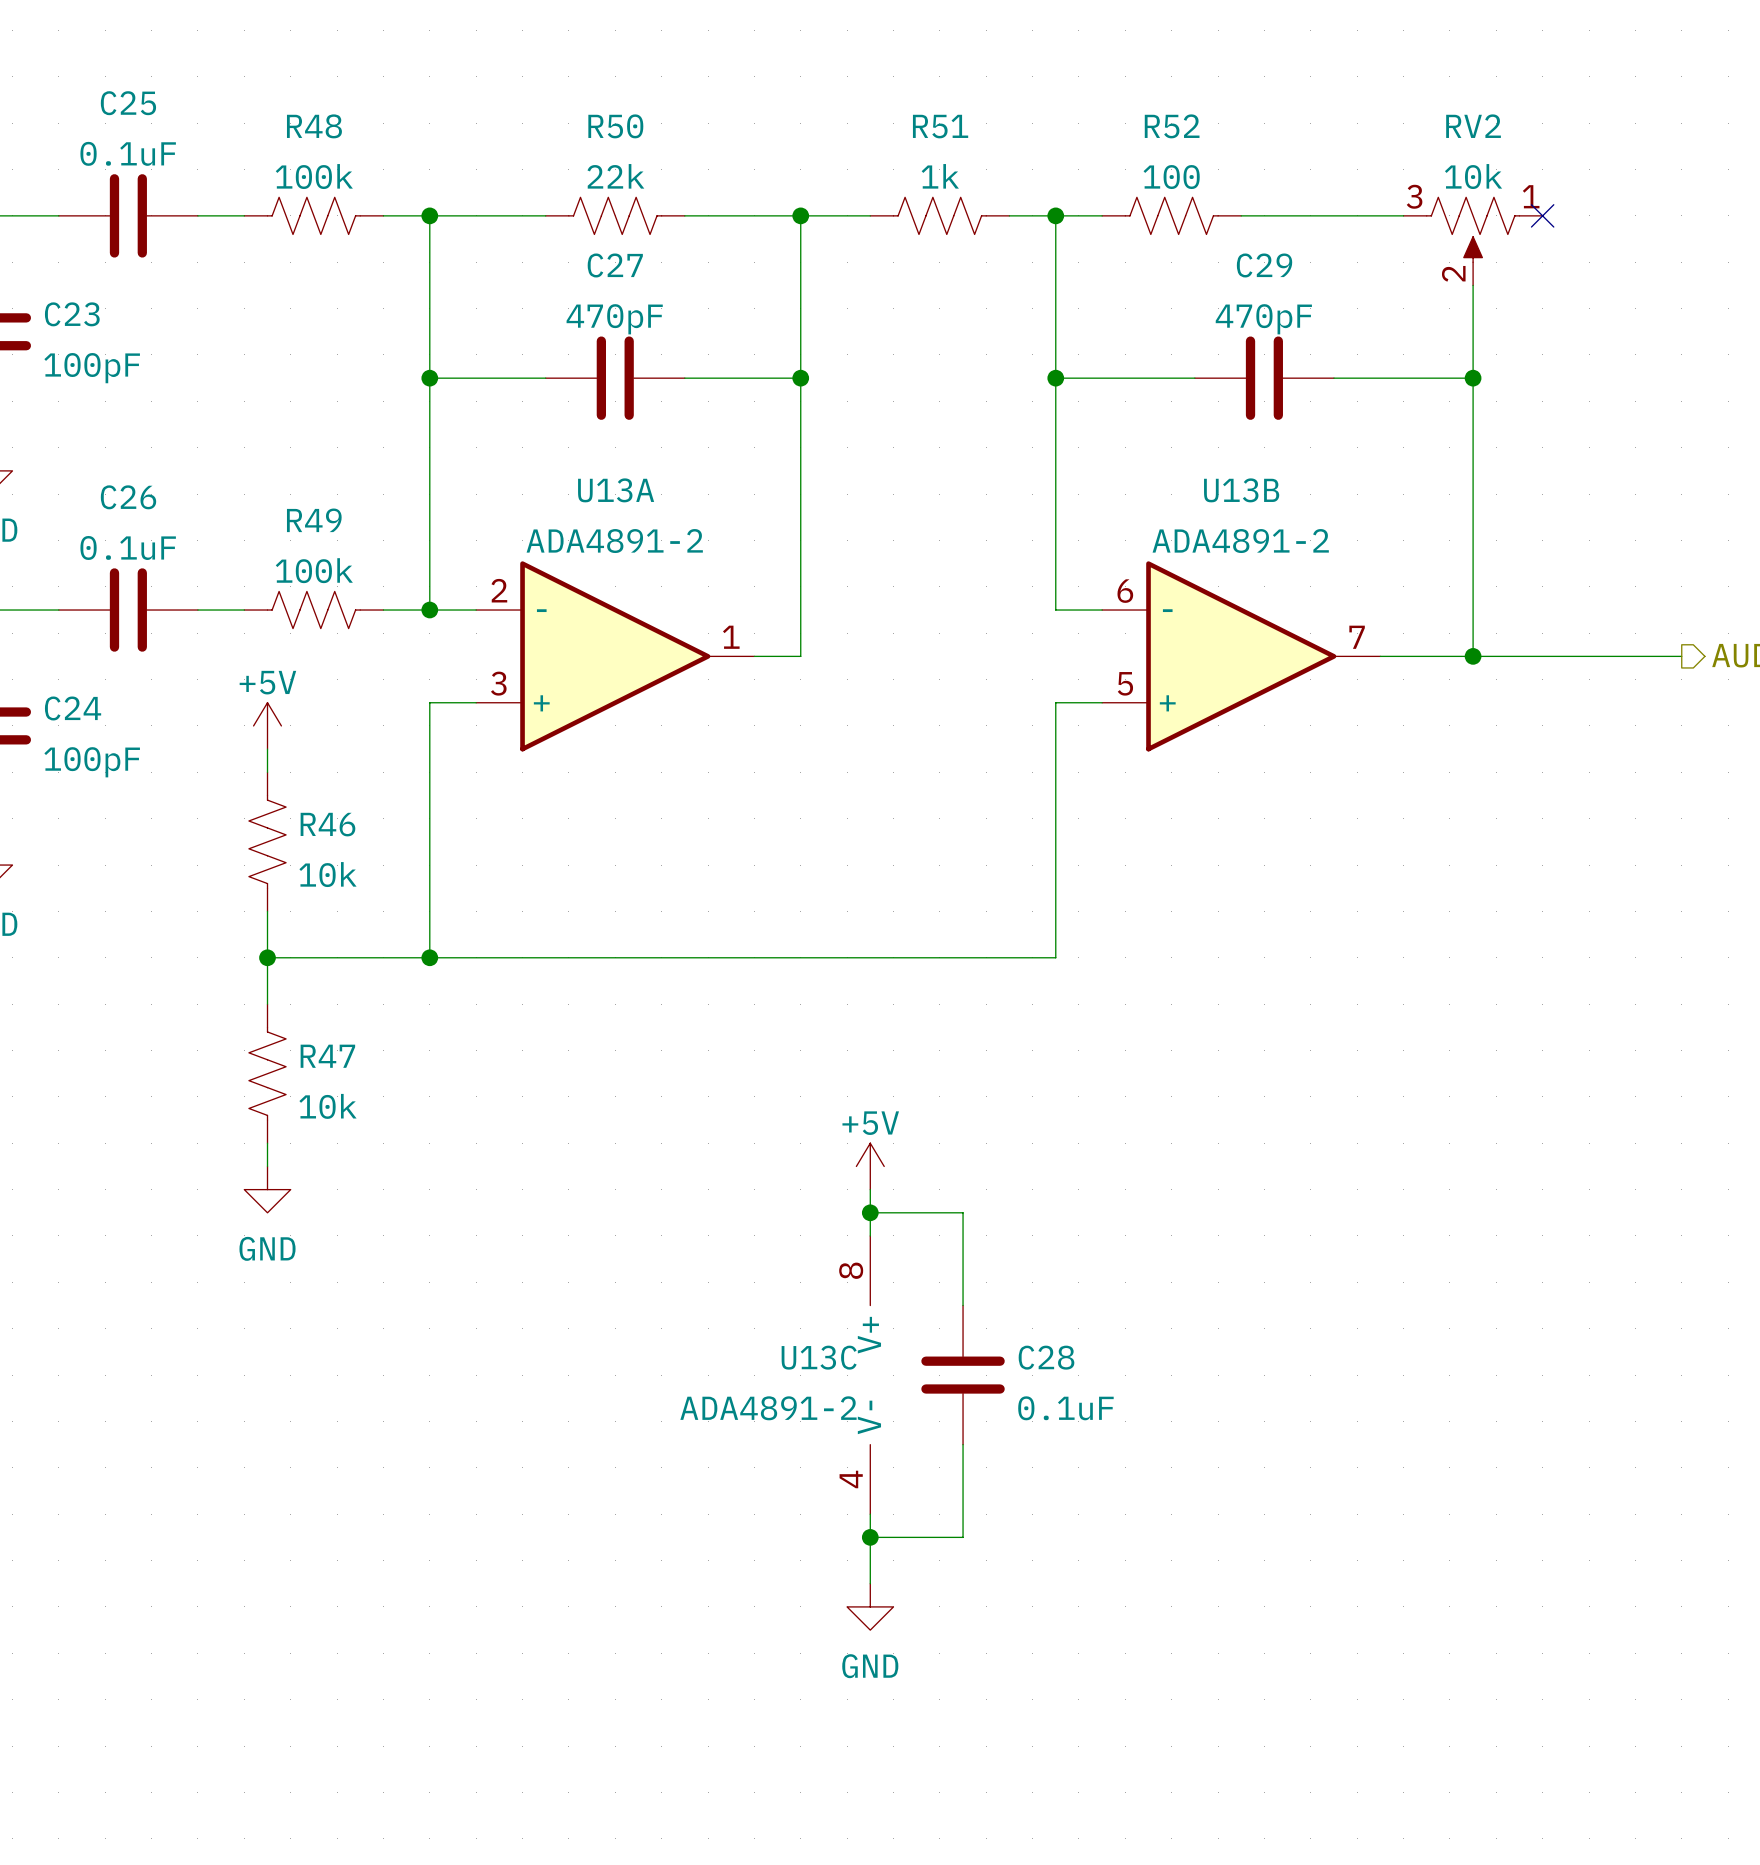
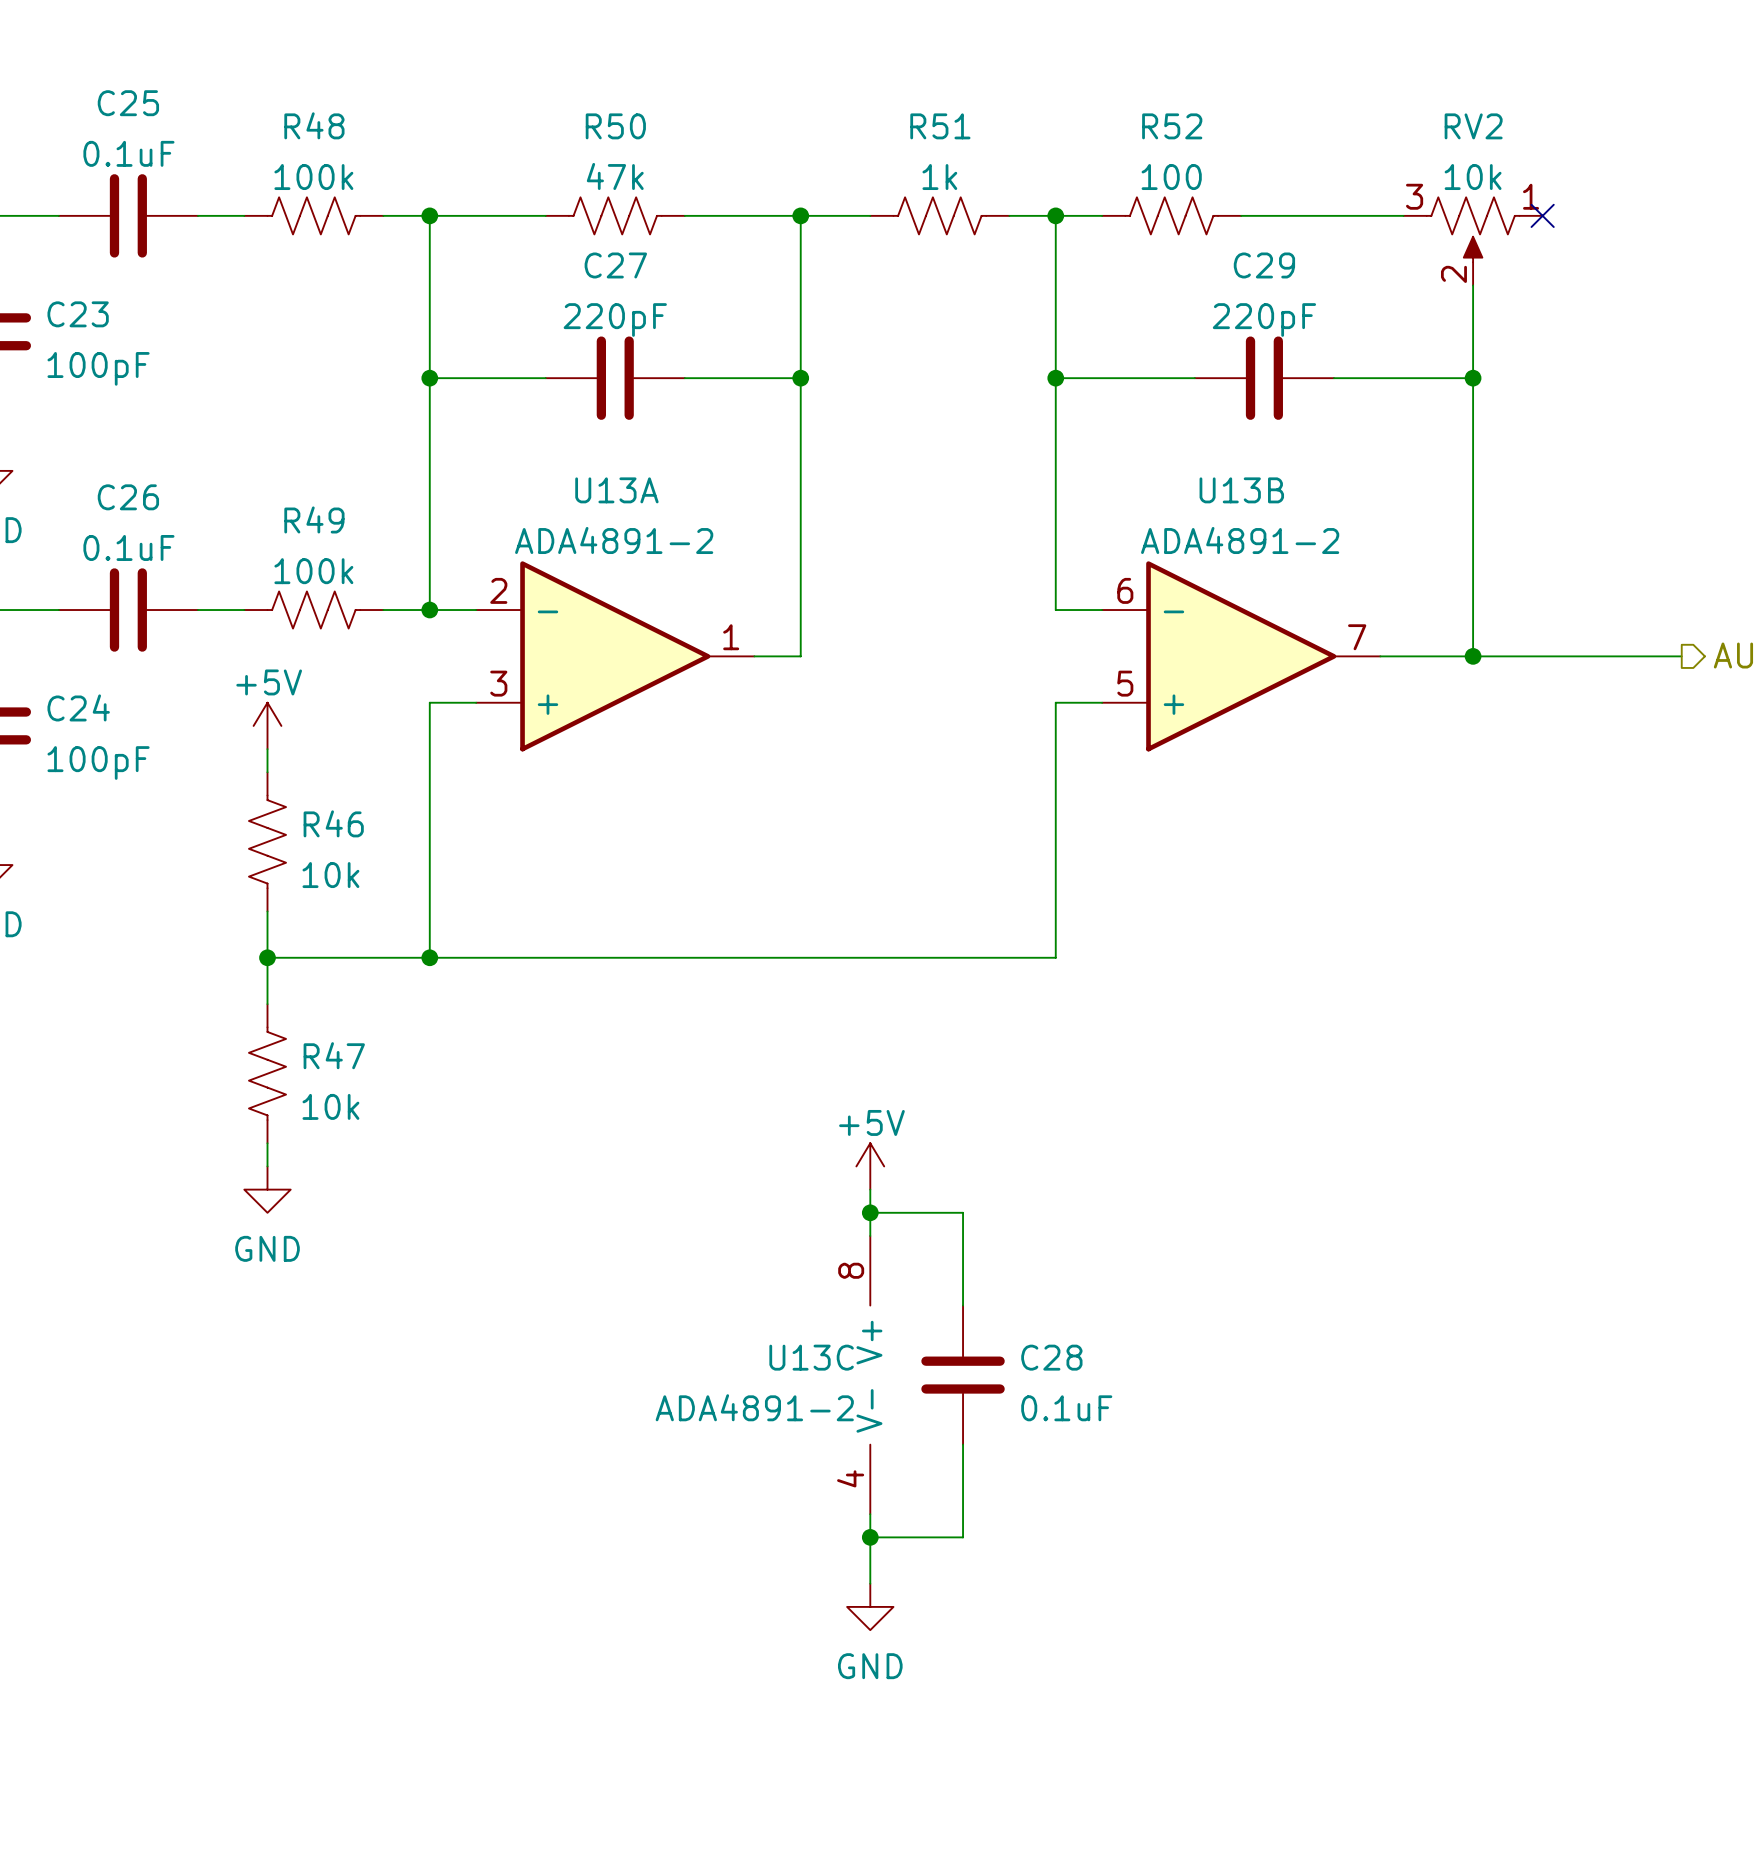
R50 value: 22k (615, 176) -> 47k (615, 176)
C27 value: 470pF (614, 319) -> 220pF (615, 320)
C29 value: 470pF (1263, 319) -> 220pF (1264, 320)

